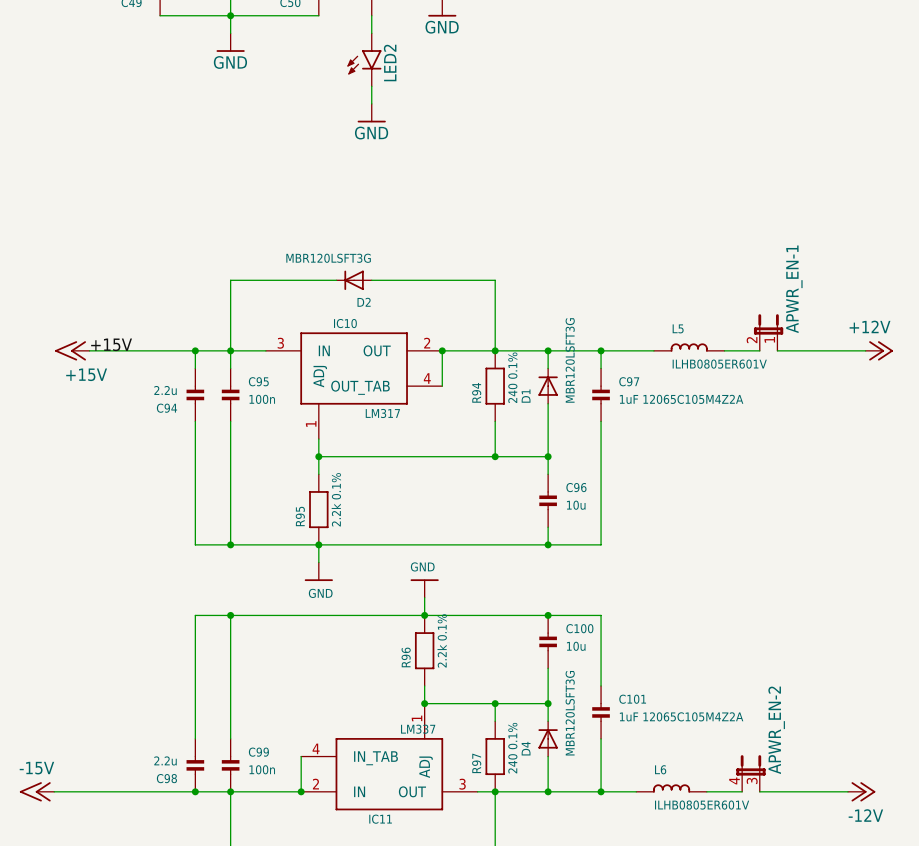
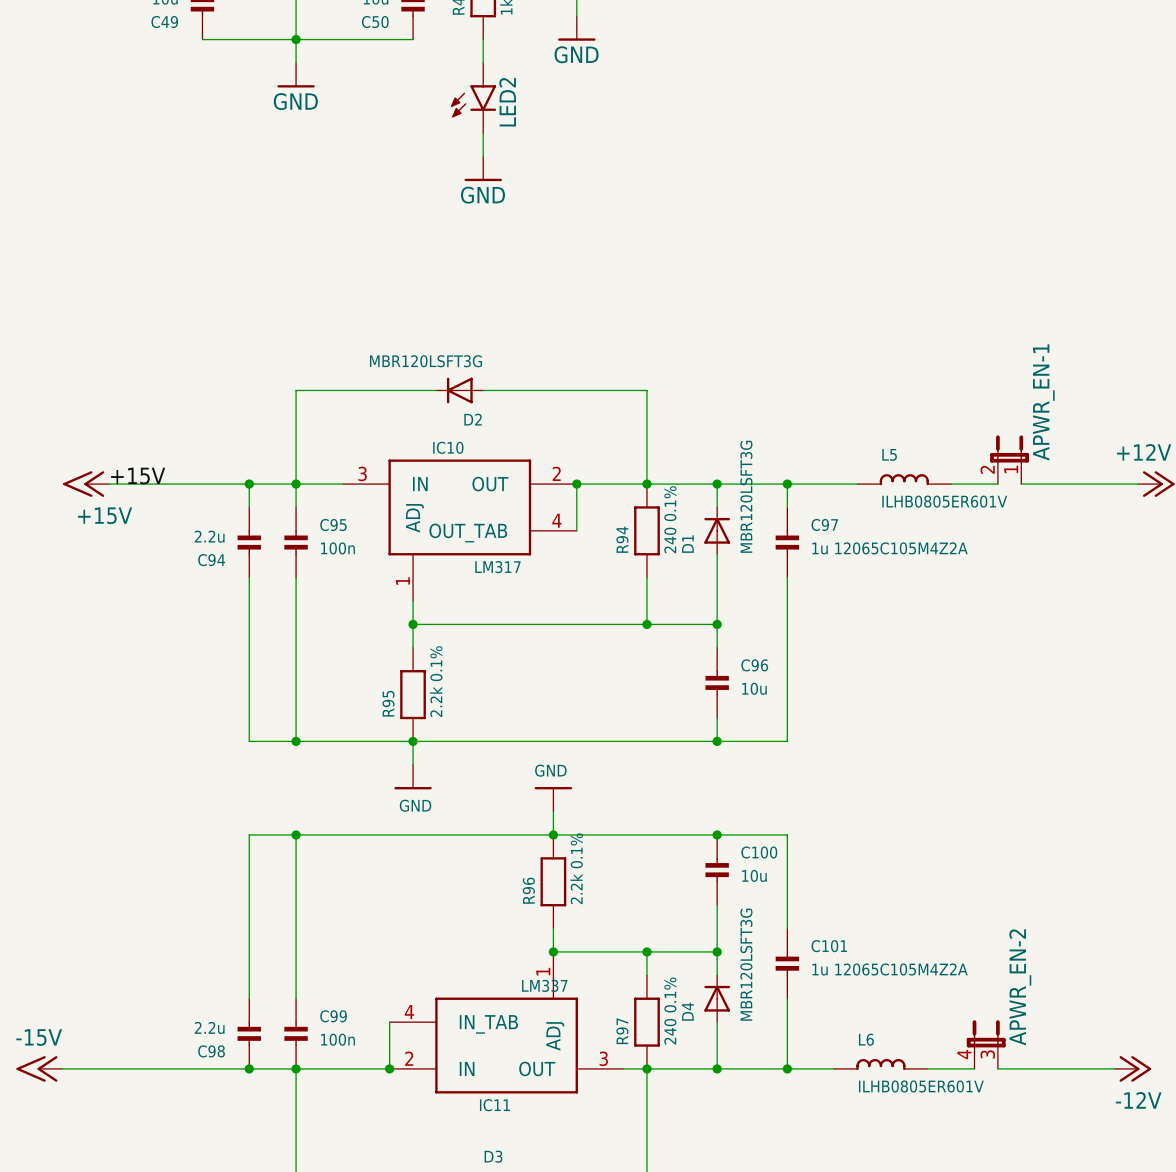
C97 value: 1uF 12065C105M4Z2A (681, 399) -> 1u 12065C105M4Z2A (890, 548)
C101 value: 1uF 12065C105M4Z2A (681, 716) -> 1u 12065C105M4Z2A (890, 969)

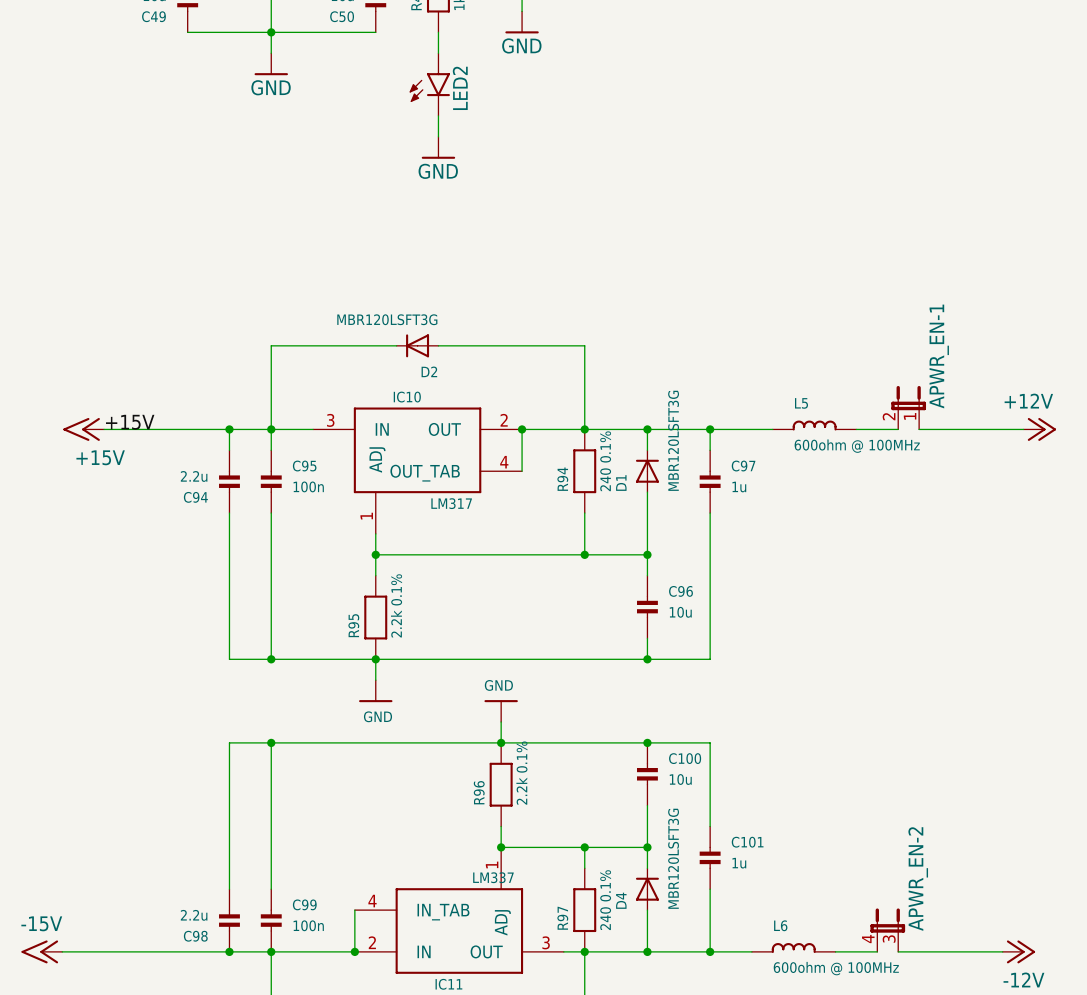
L5 value: ILHB0805ER601V (944, 501) -> 600ohm @ 100MHz (857, 446)
C97 value: 1u 12065C105M4Z2A (890, 548) -> 1u (739, 487)
C101 value: 1u 12065C105M4Z2A (890, 969) -> 1u (739, 863)
L6 value: ILHB0805ER601V (921, 1086) -> 600ohm @ 100MHz (836, 968)

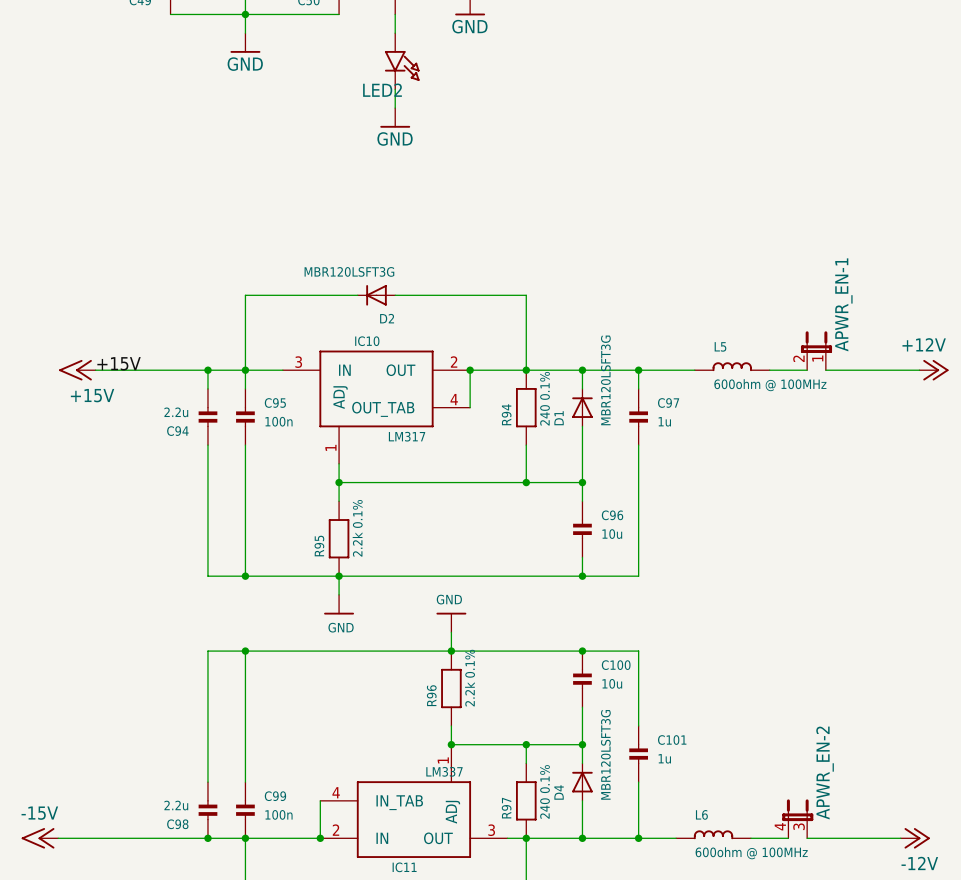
LED2 symbol: [409, 53, 450, 116] -> [384, 33, 420, 90]
LED2 name position: LED2 (460, 88) -> LED2 (382, 90)

